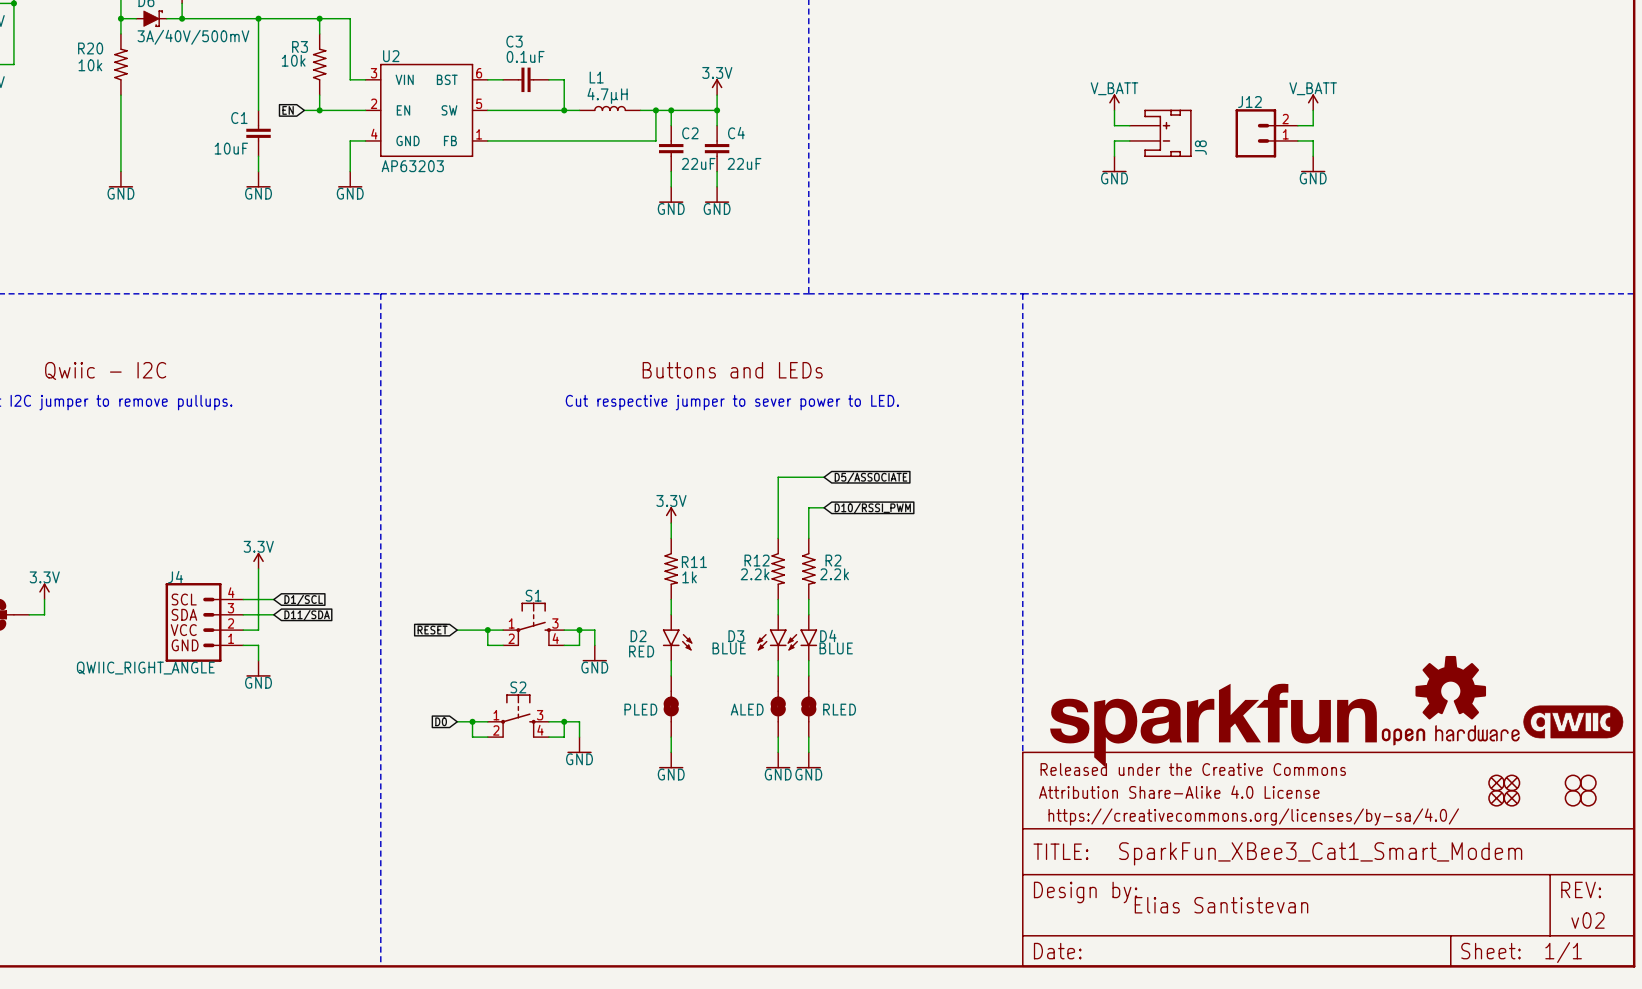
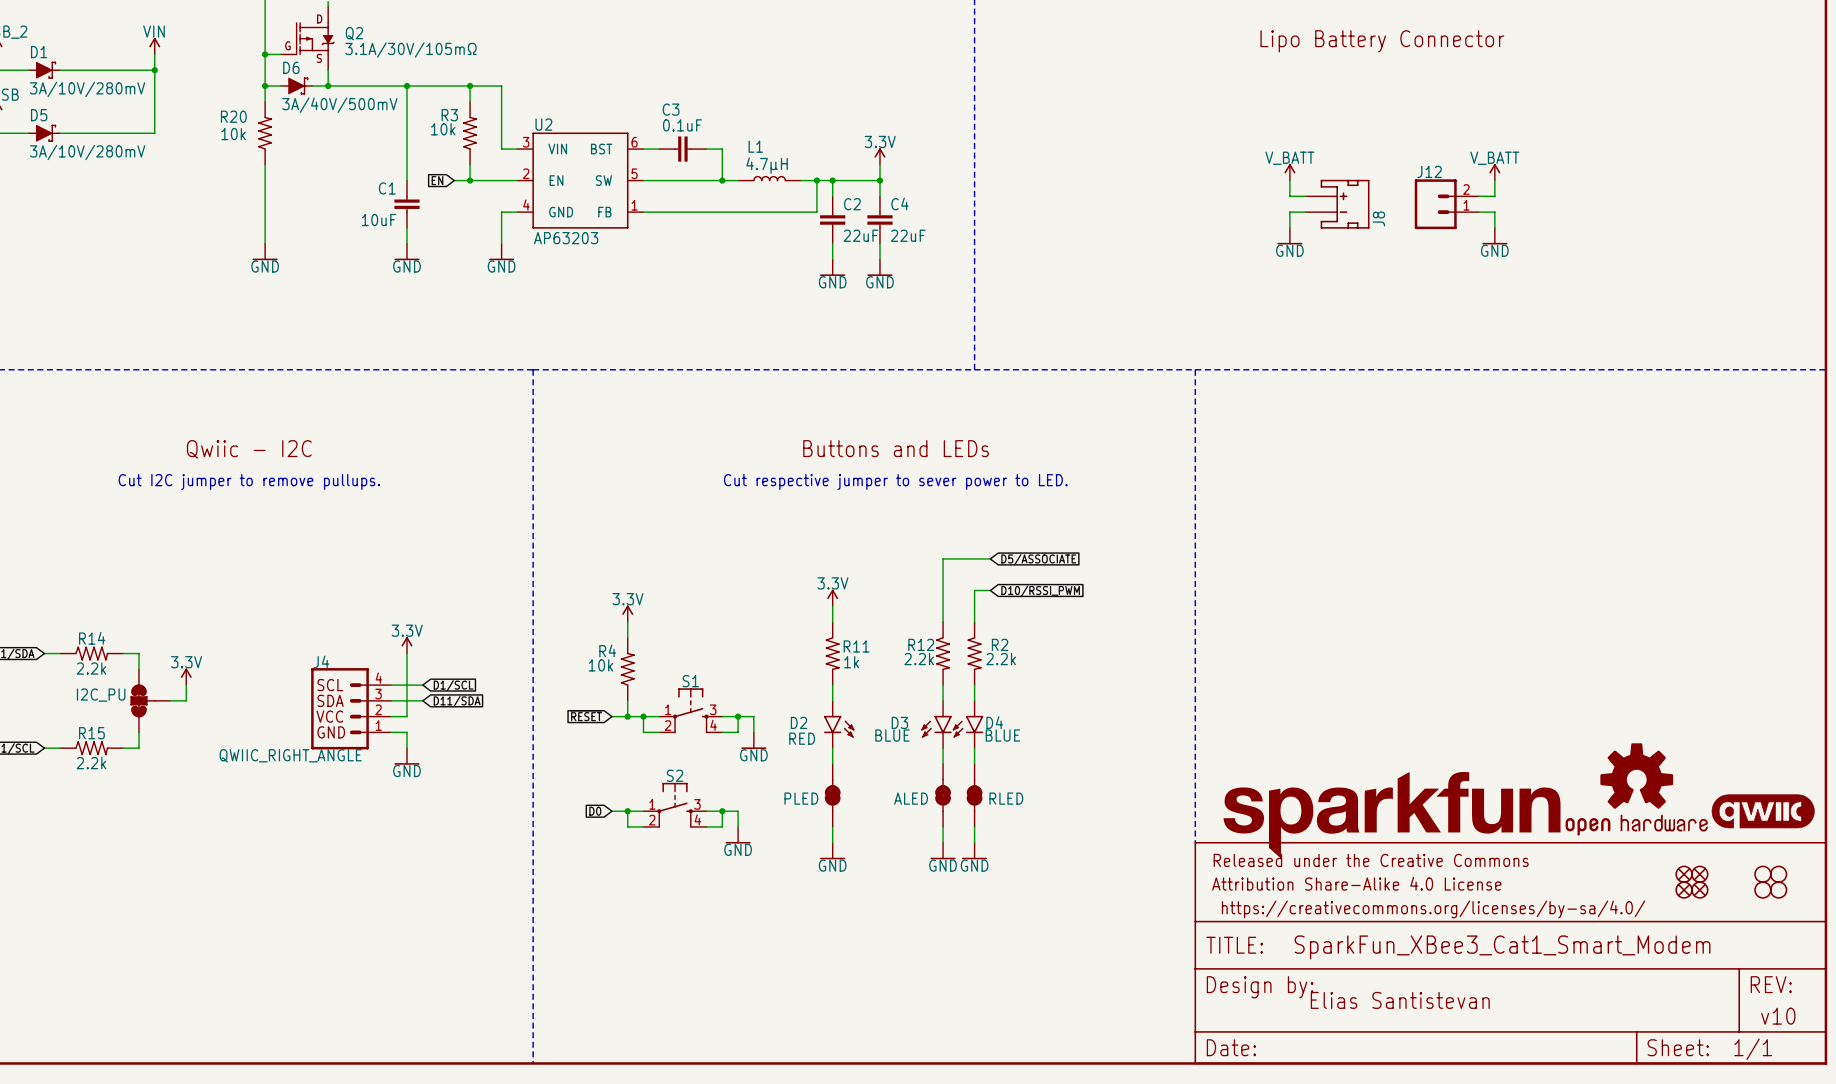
power symbol: none -> 3.3V (627, 613)
wire: none -> (627, 622) (627, 637)
R4: none -> 10k (627, 669)
wire: none -> (627, 700) (627, 716)
junction: none -> (627, 716)
text: v02 (1588, 920) -> v10 (1778, 1016)

